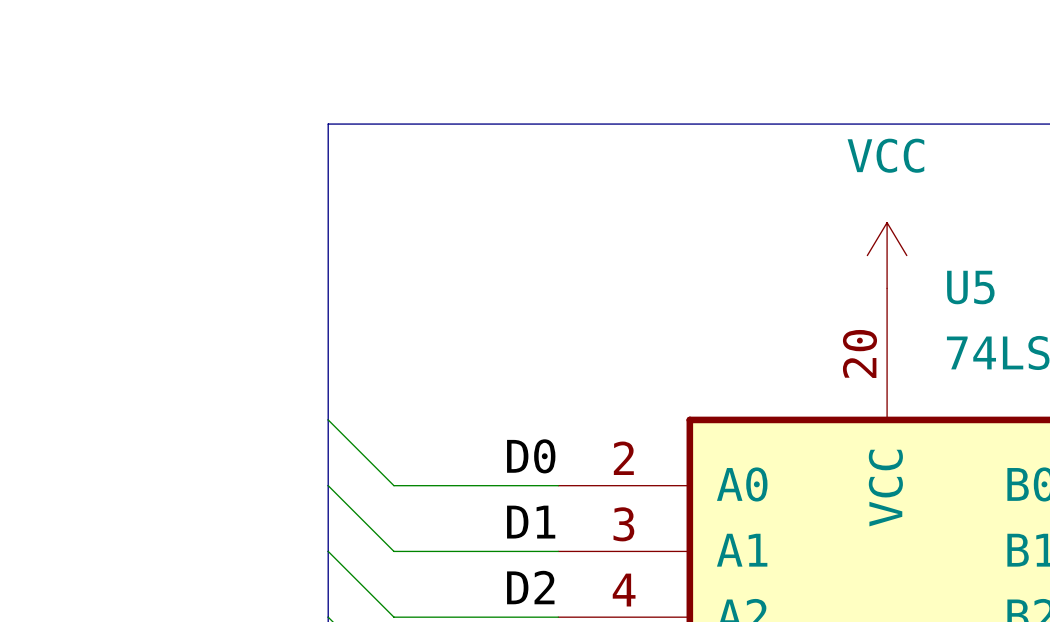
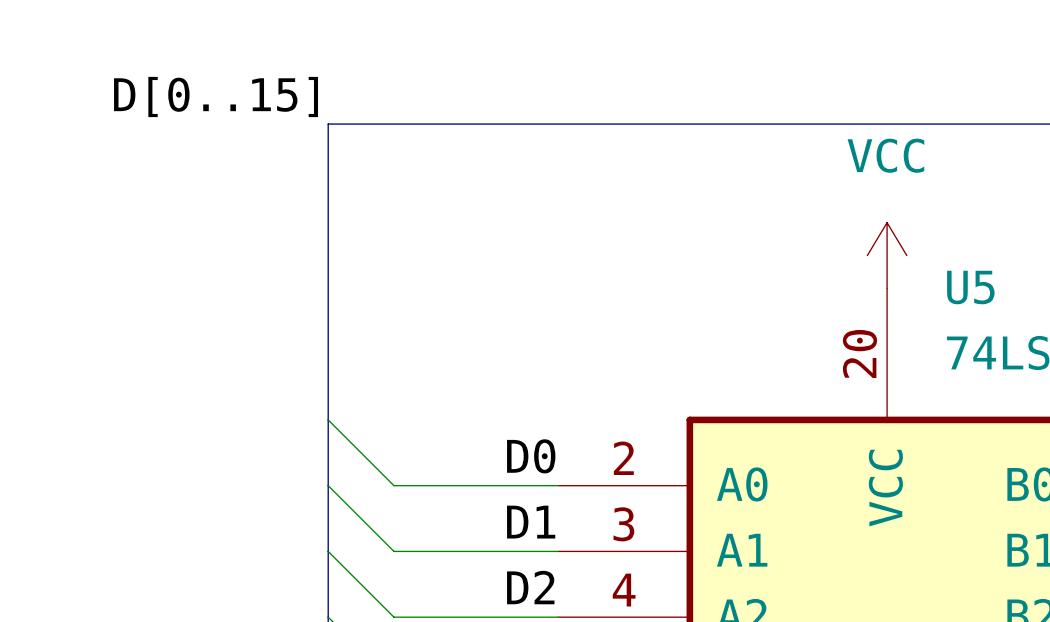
label: none -> D[0..15] (216, 97)

